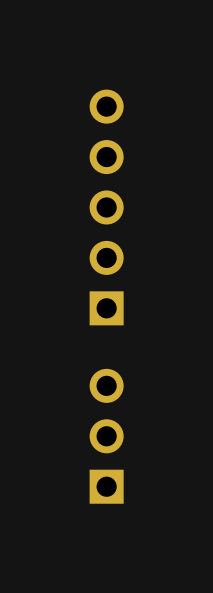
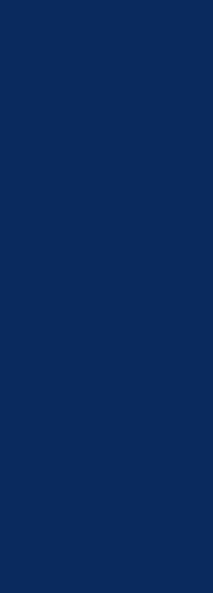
part: (106, 207) -> none
part: (106, 436) -> none

